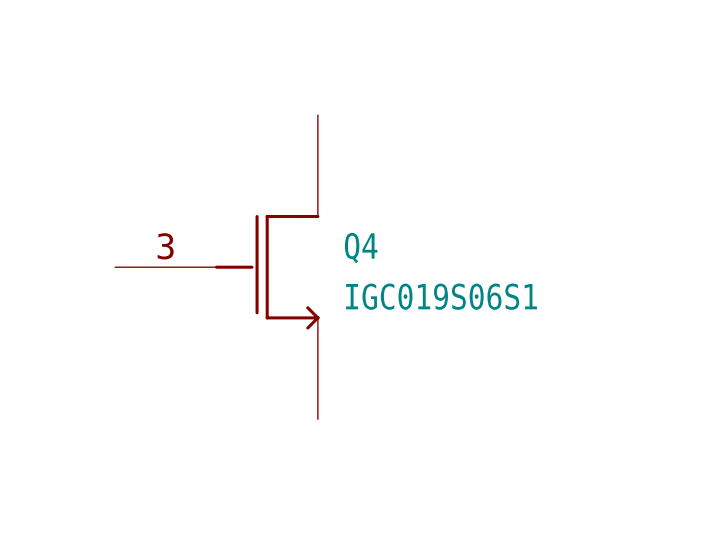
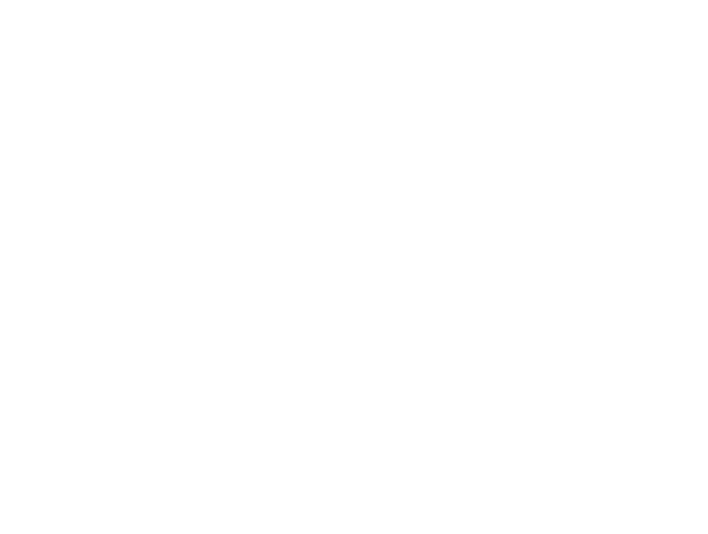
Q4: IGC019S06S1 (217, 267) -> none

